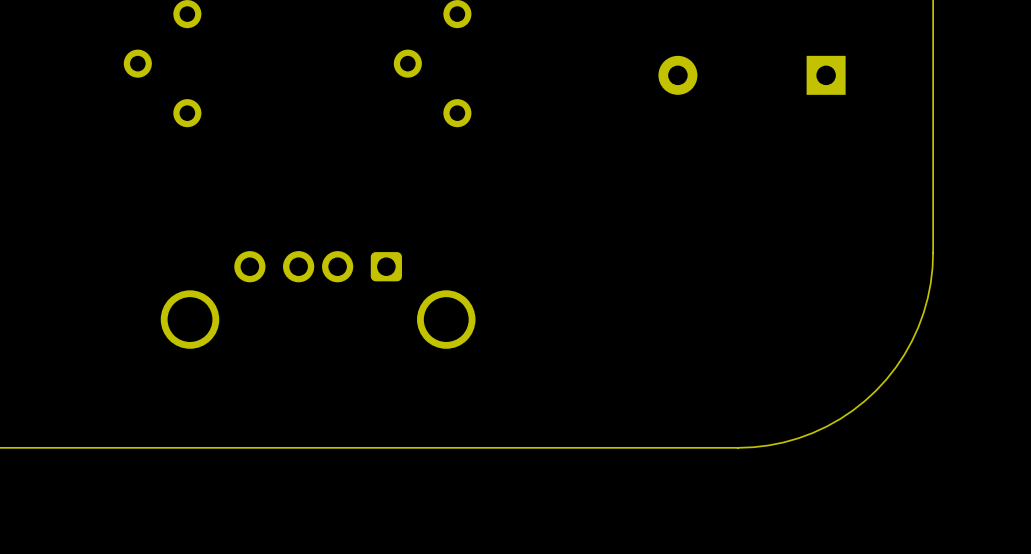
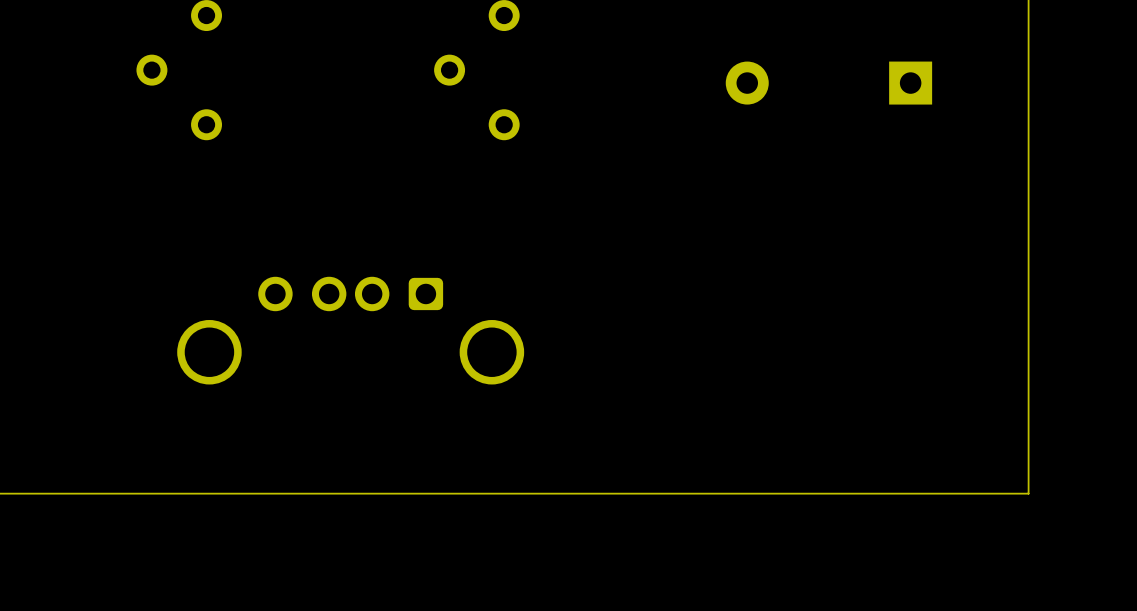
board edge: (933, 252) (930, 283) (918, 327) (904, 354) (876, 390) (852, 410) (812, 433) (783, 442) (738, 447) -> (1028, 278) (1028, 493) (813, 493)

